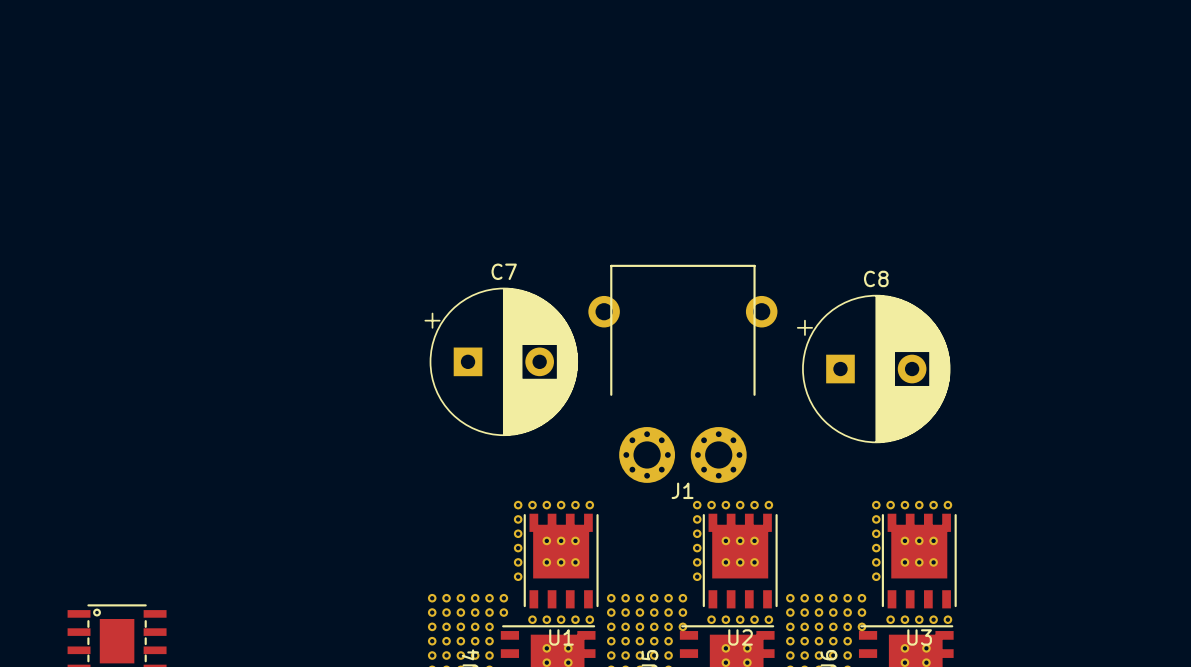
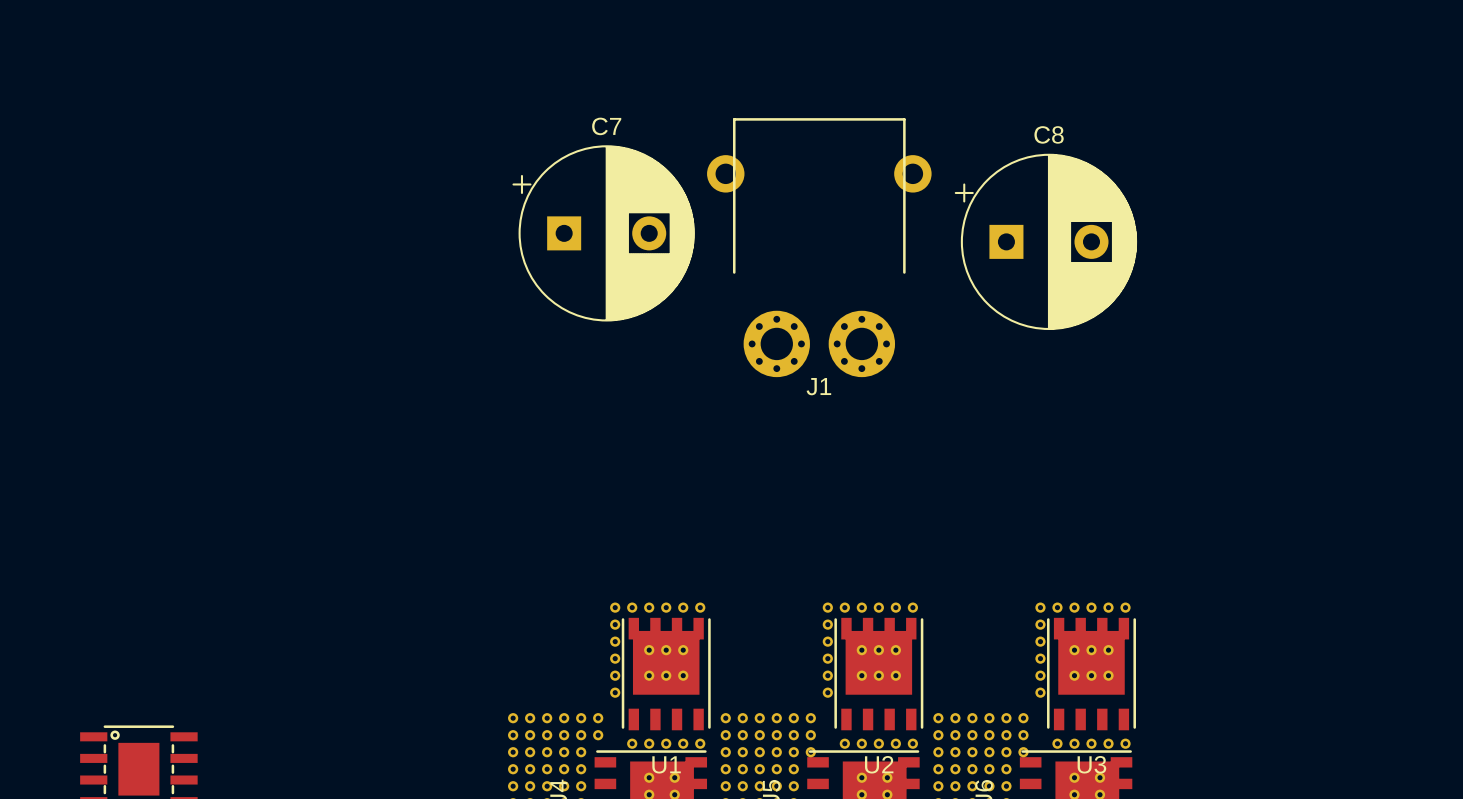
C7 position: (501, 361) -> (603, 233)
C8 position: (873, 369) -> (1045, 241)
J1 position: (682, 373) -> (819, 247)

